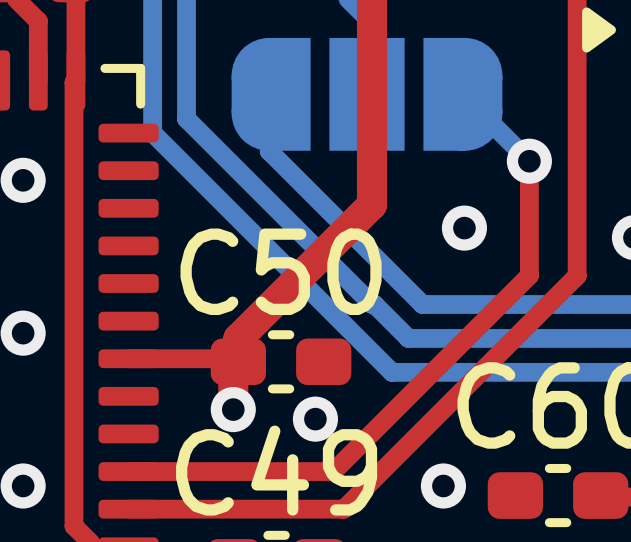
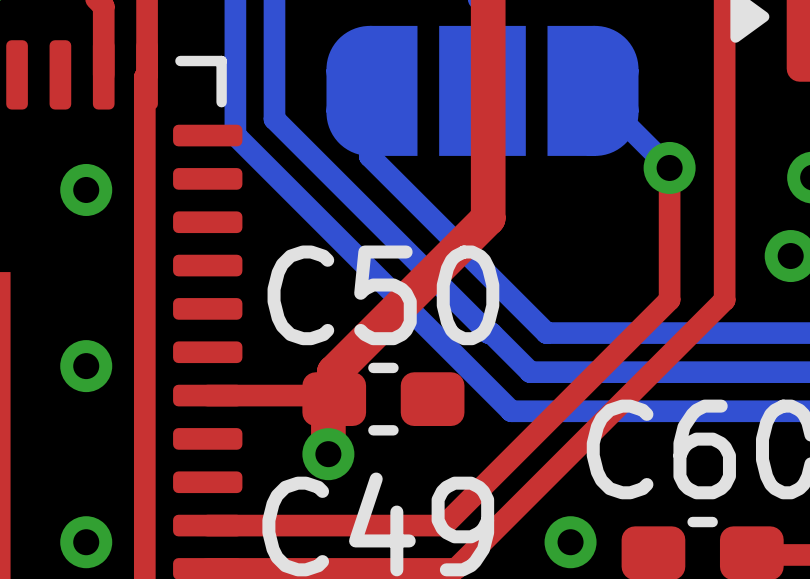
via: (464, 228) -> none
via: (315, 419) -> none

